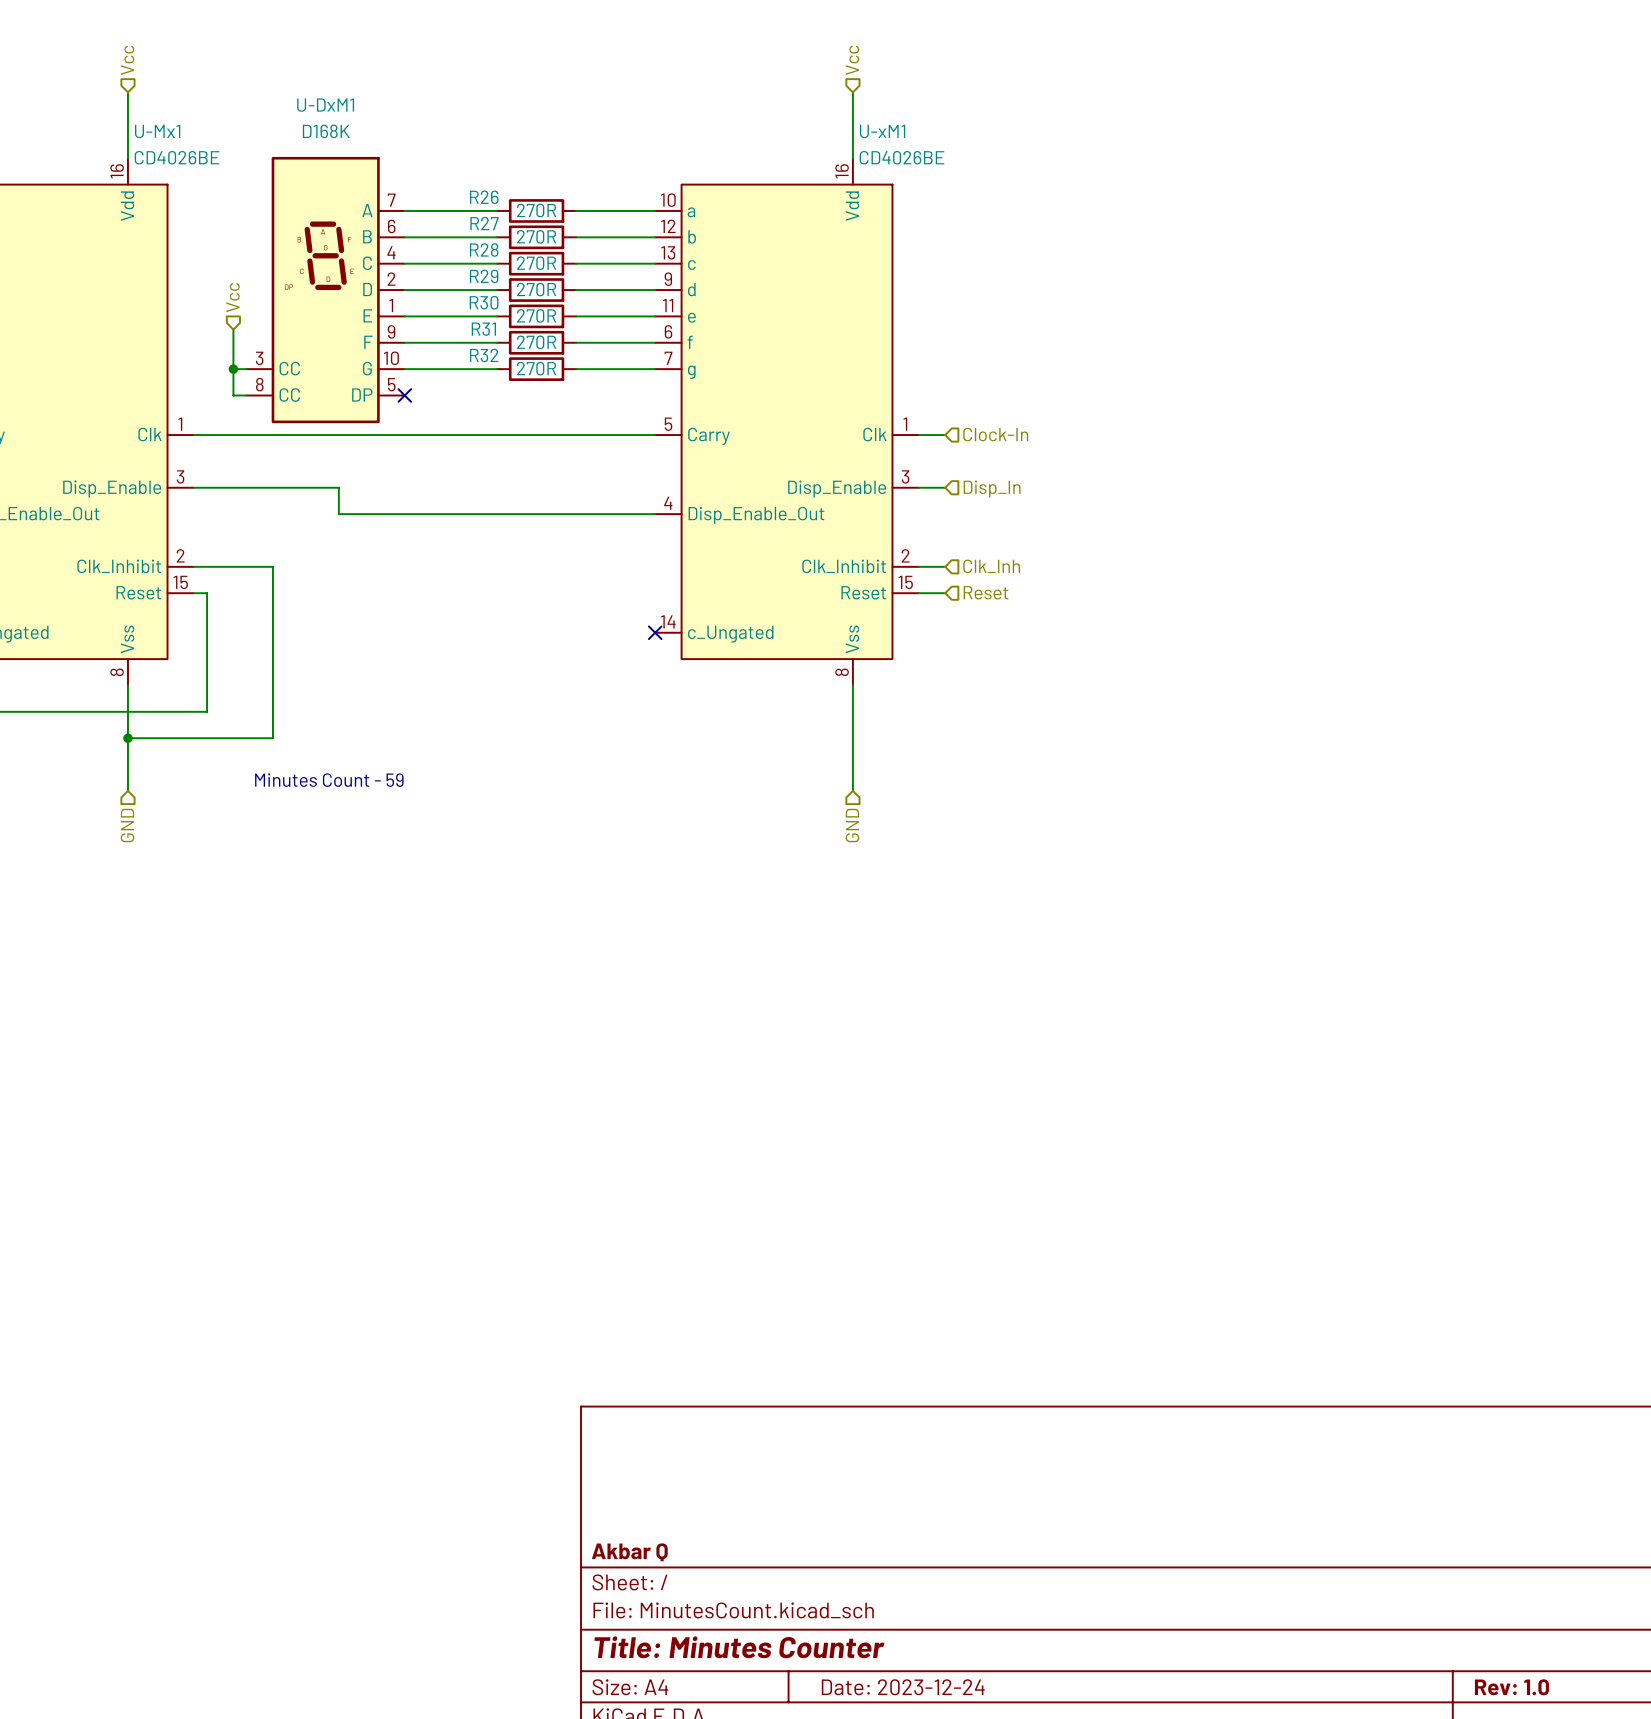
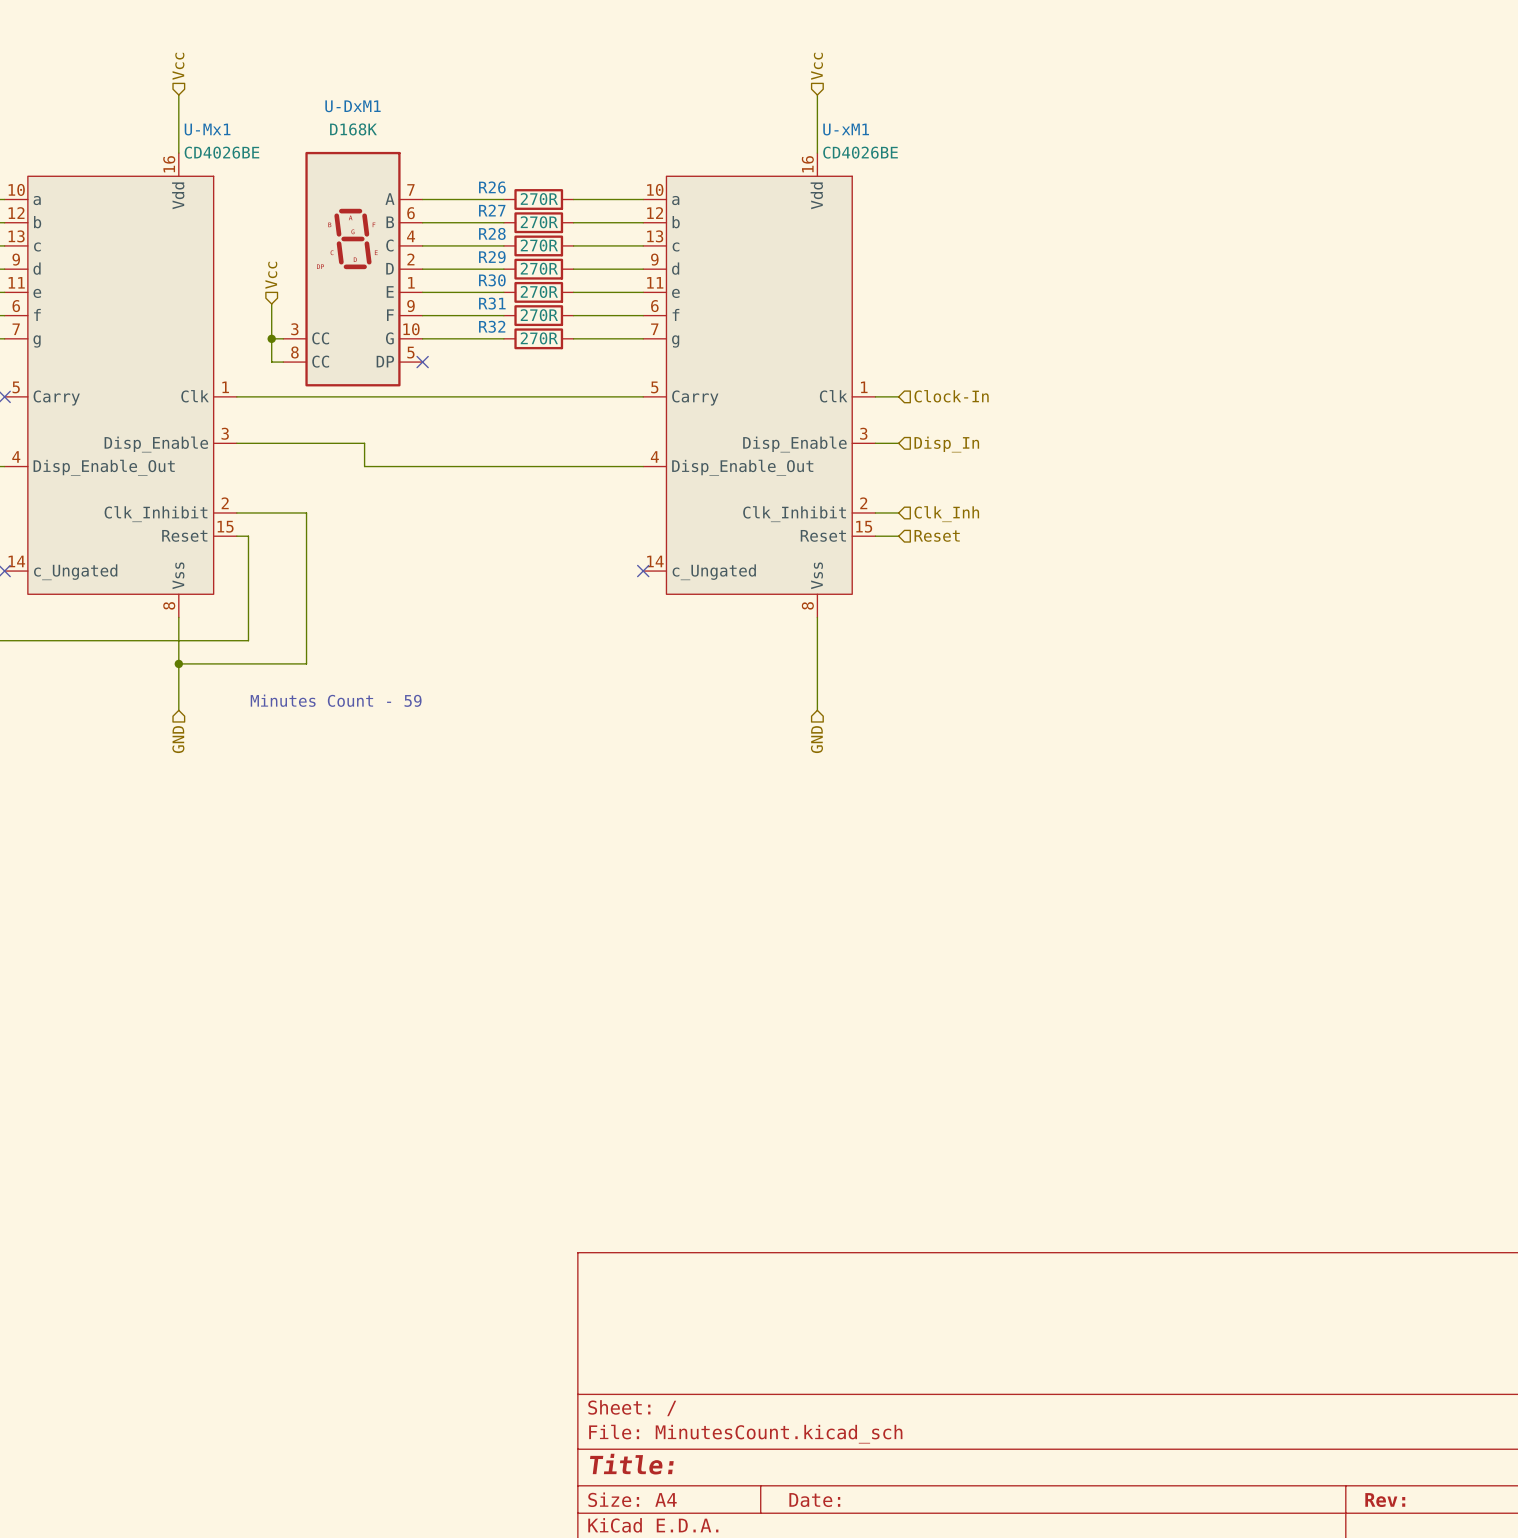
title block: Akbar Q (629, 1552) -> none
title block: Title: Minutes Counter (739, 1647) -> Title: (631, 1464)
title block: Date: 2023-12-24 (903, 1687) -> Date: (814, 1500)
title block: Rev: 1.0 (1511, 1687) -> Rev: (1385, 1500)

